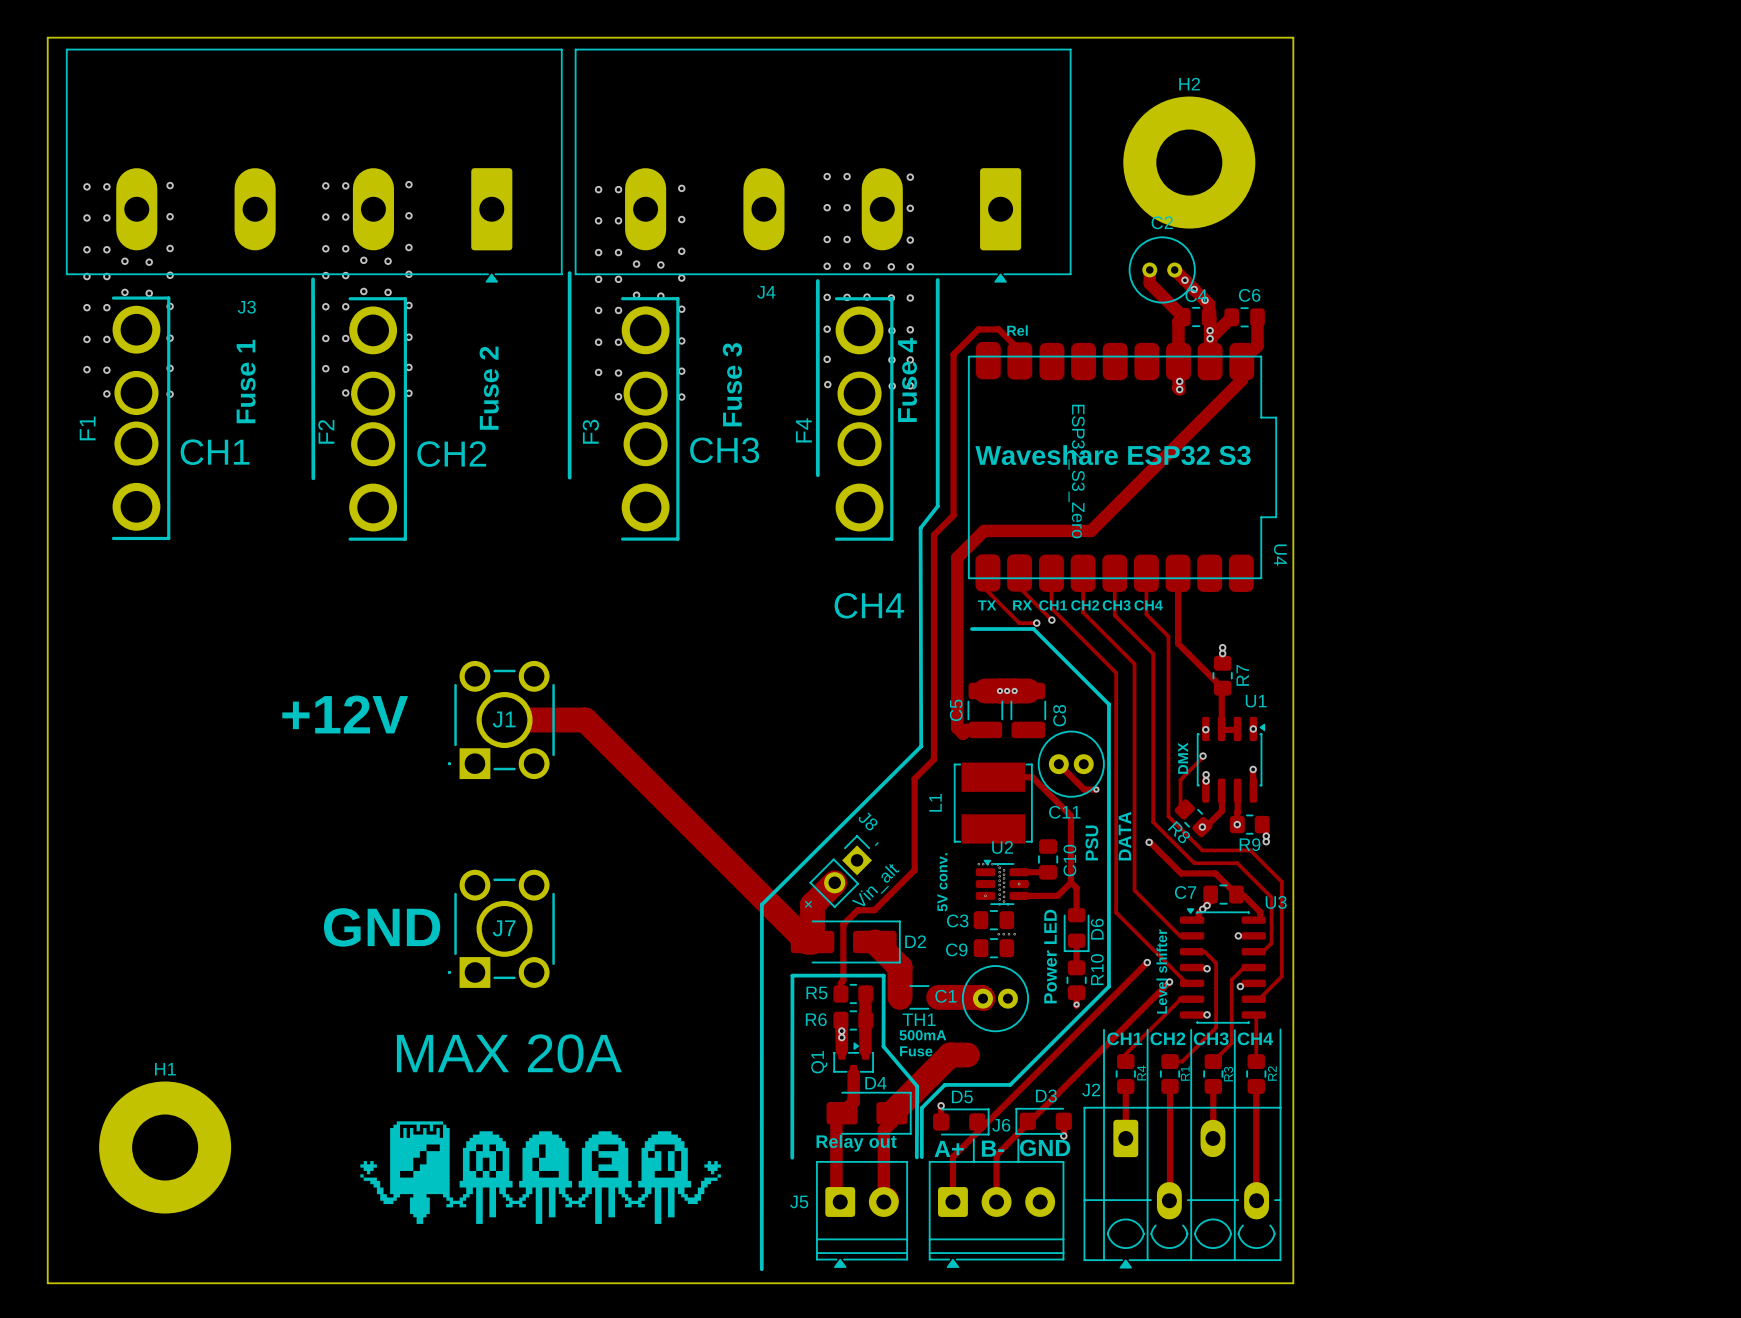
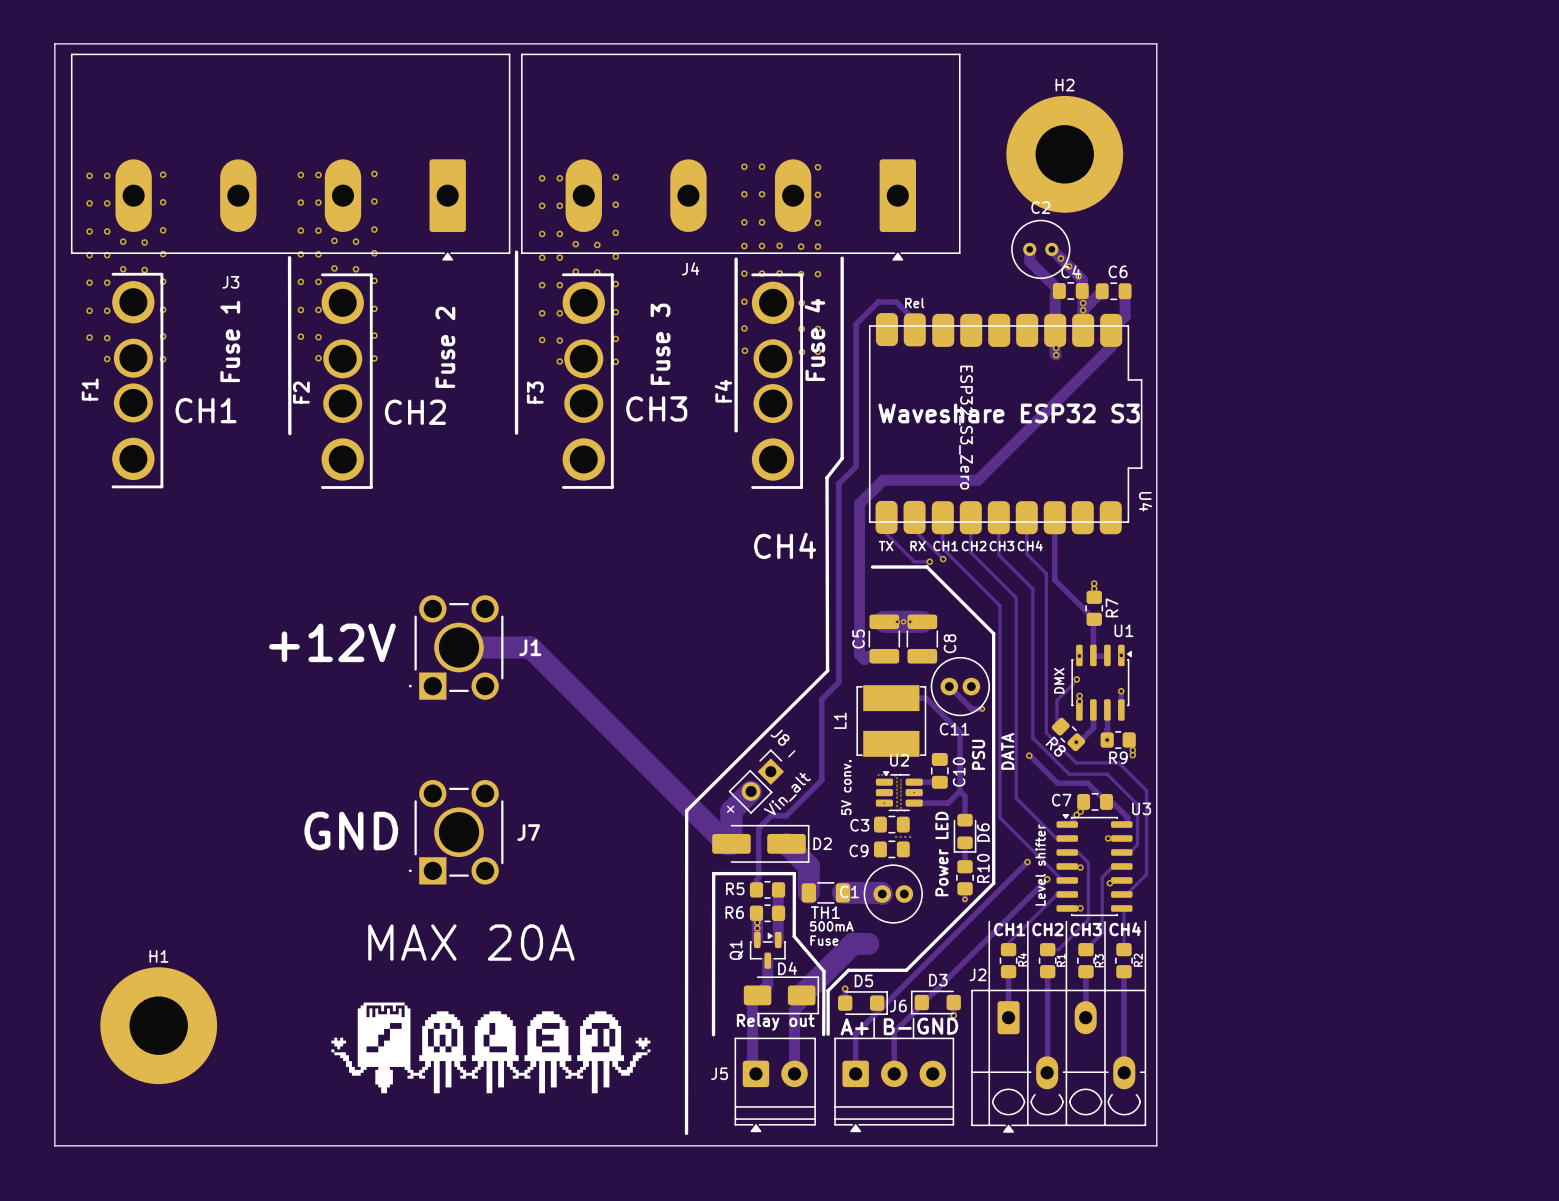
J1 name position: J1 (504, 719) -> J1 (530, 647)
J7 name position: J7 (504, 928) -> J7 (528, 832)

